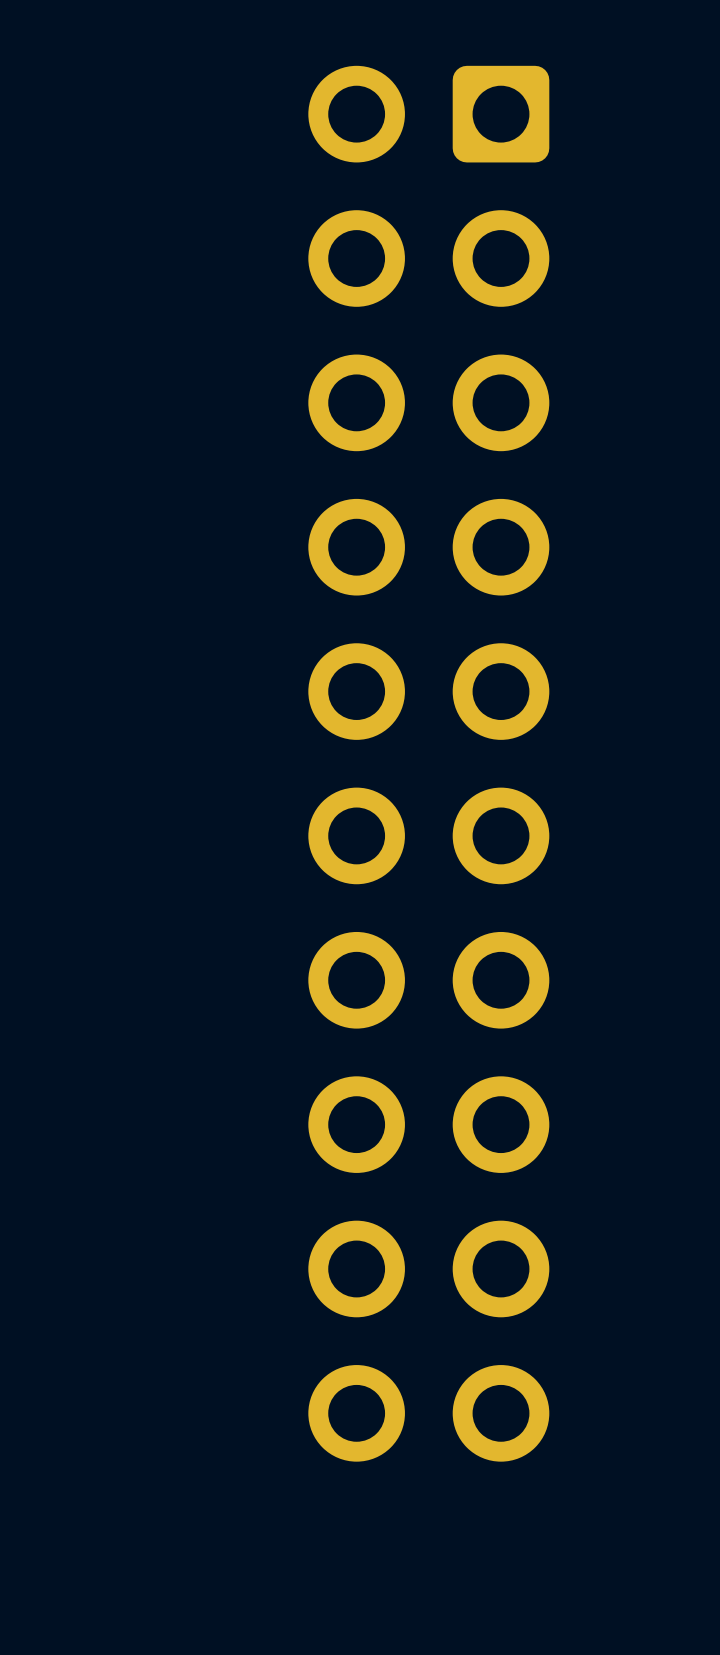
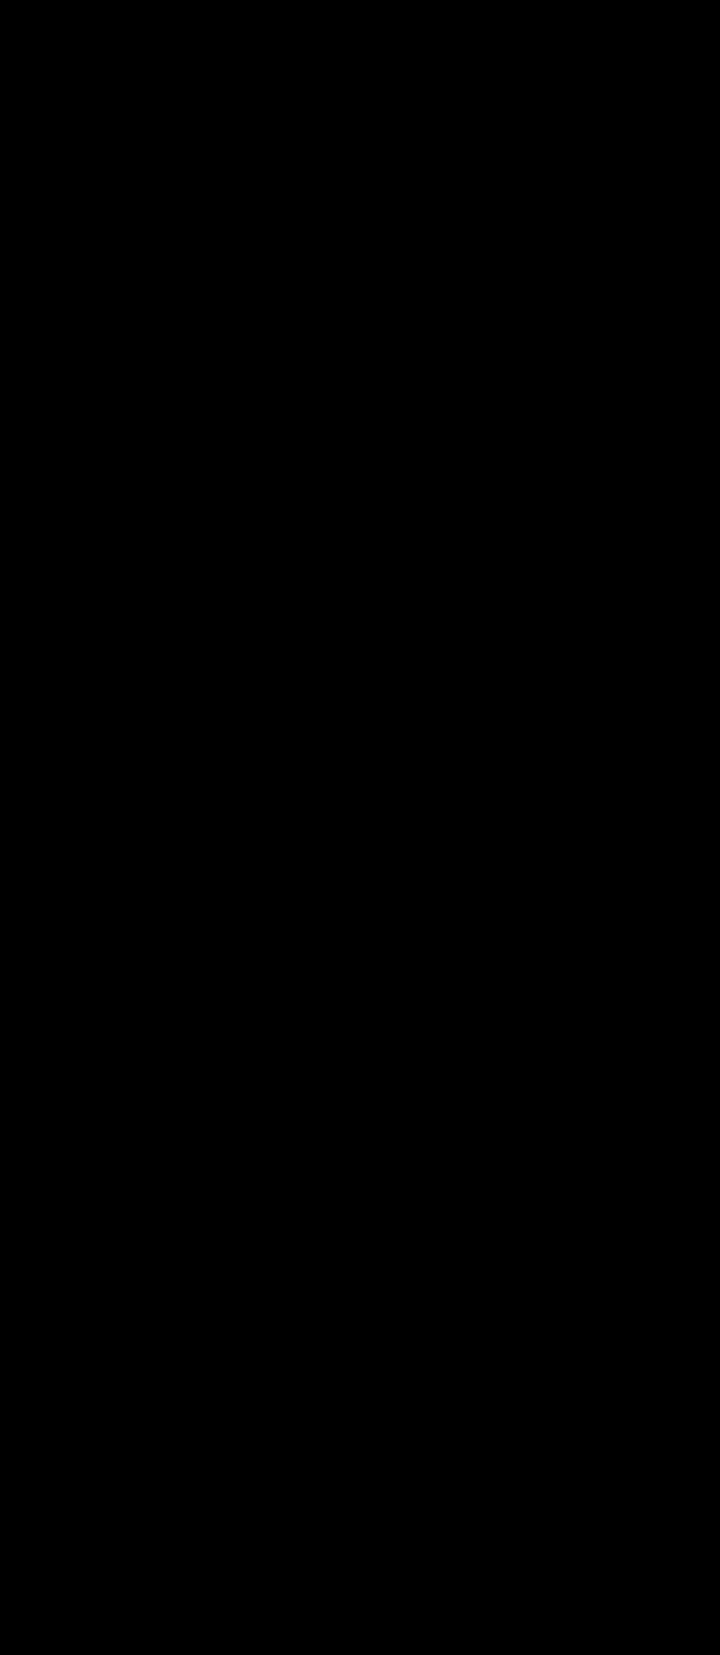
part: (428, 763) -> none

